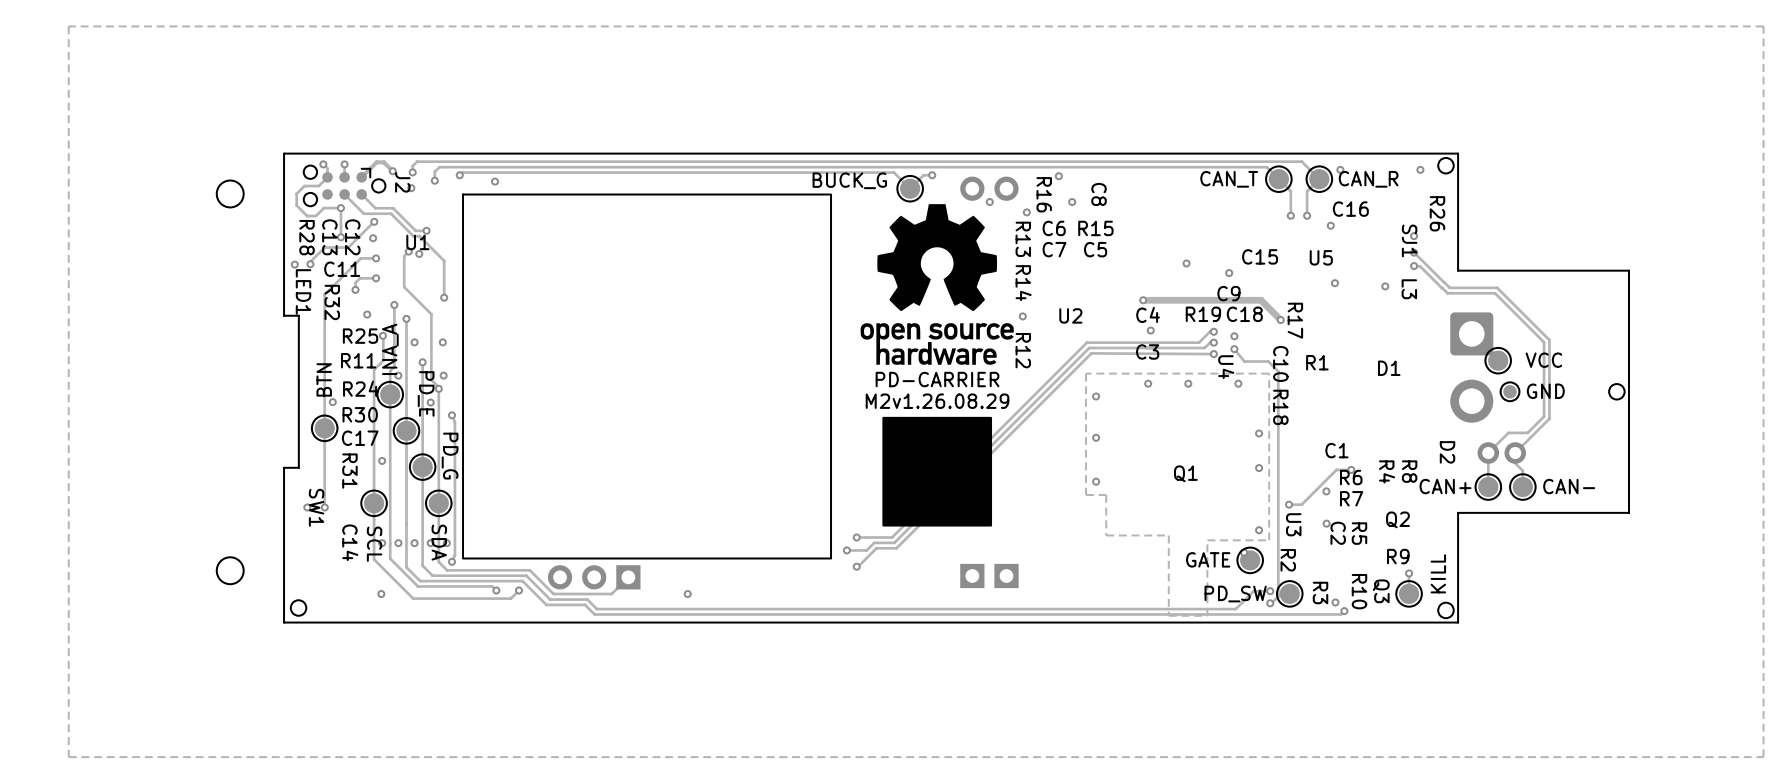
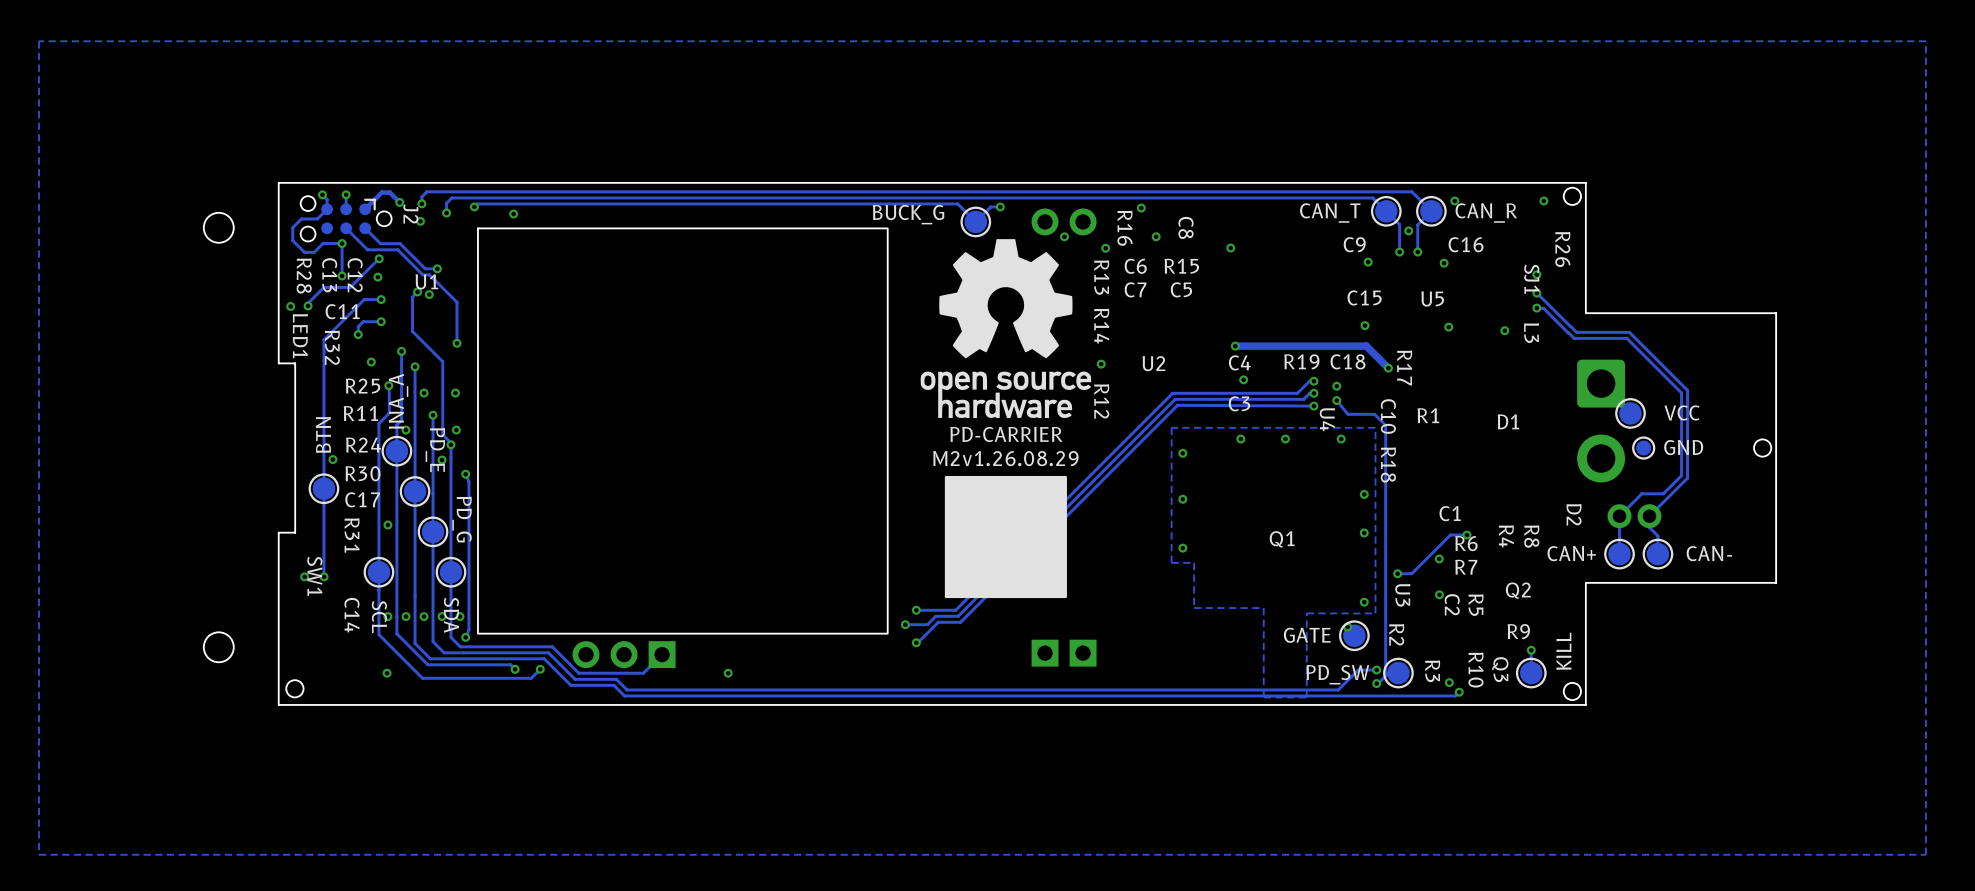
via: none -> (1408, 230)
via: none -> (1230, 248)
via: none -> (1368, 262)
via: (1186, 263) -> none
via: (1229, 273) -> none
via: none -> (1365, 325)
C9 position: (1228, 293) -> (1354, 244)

